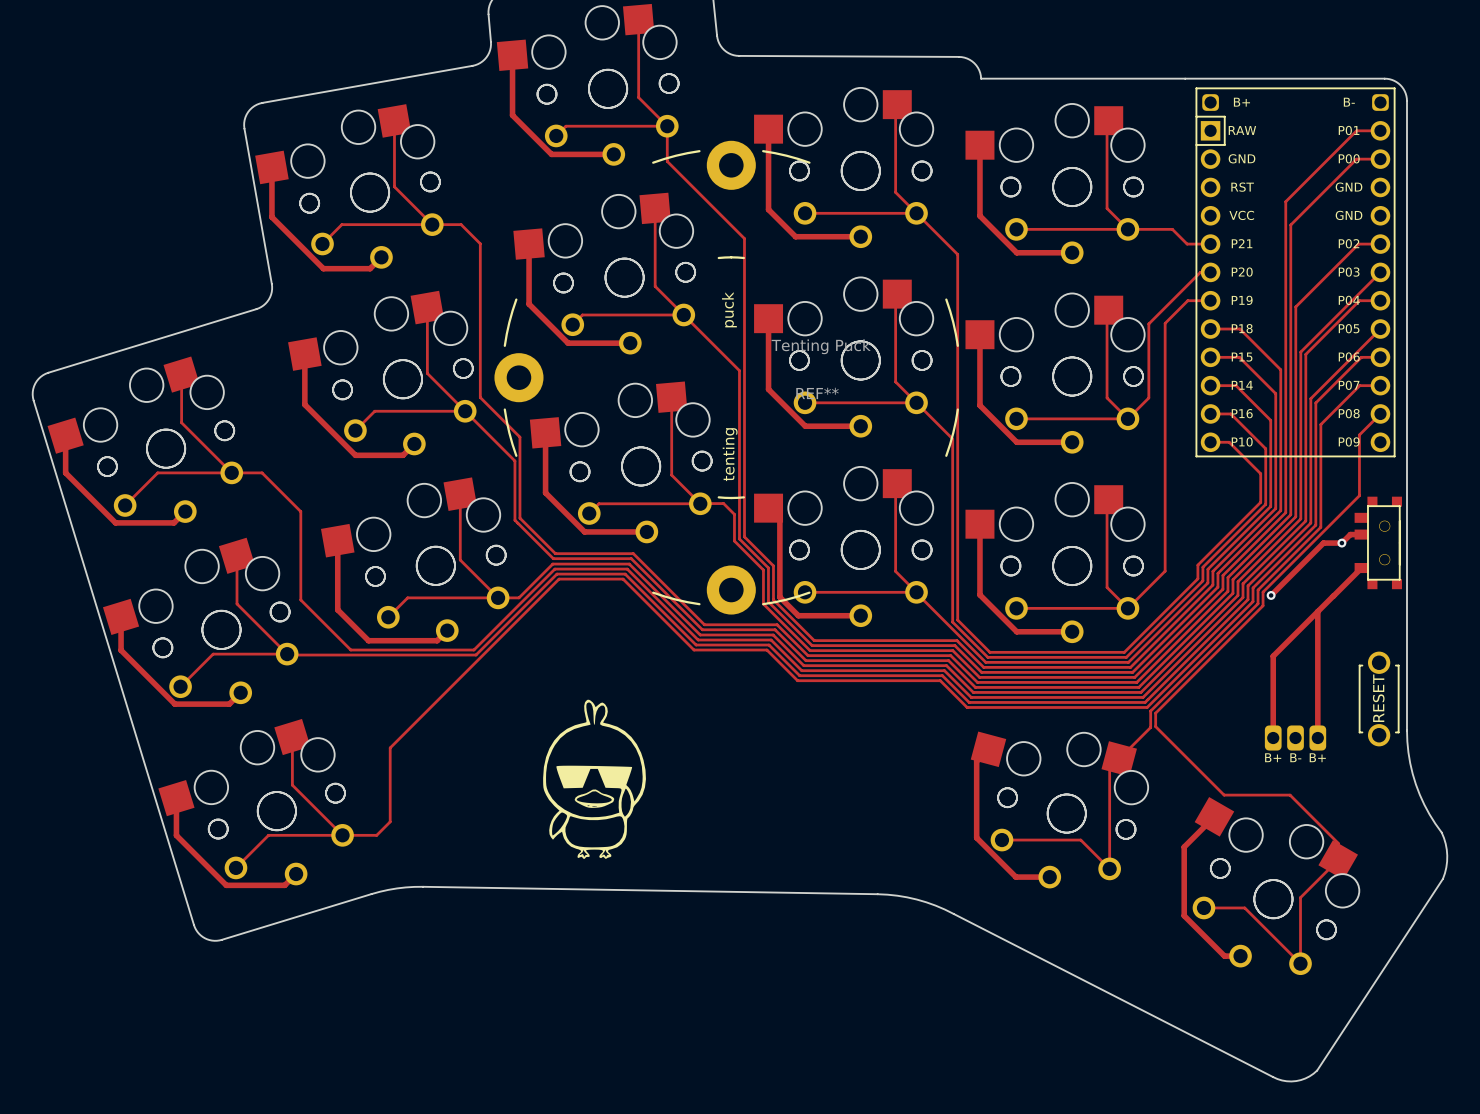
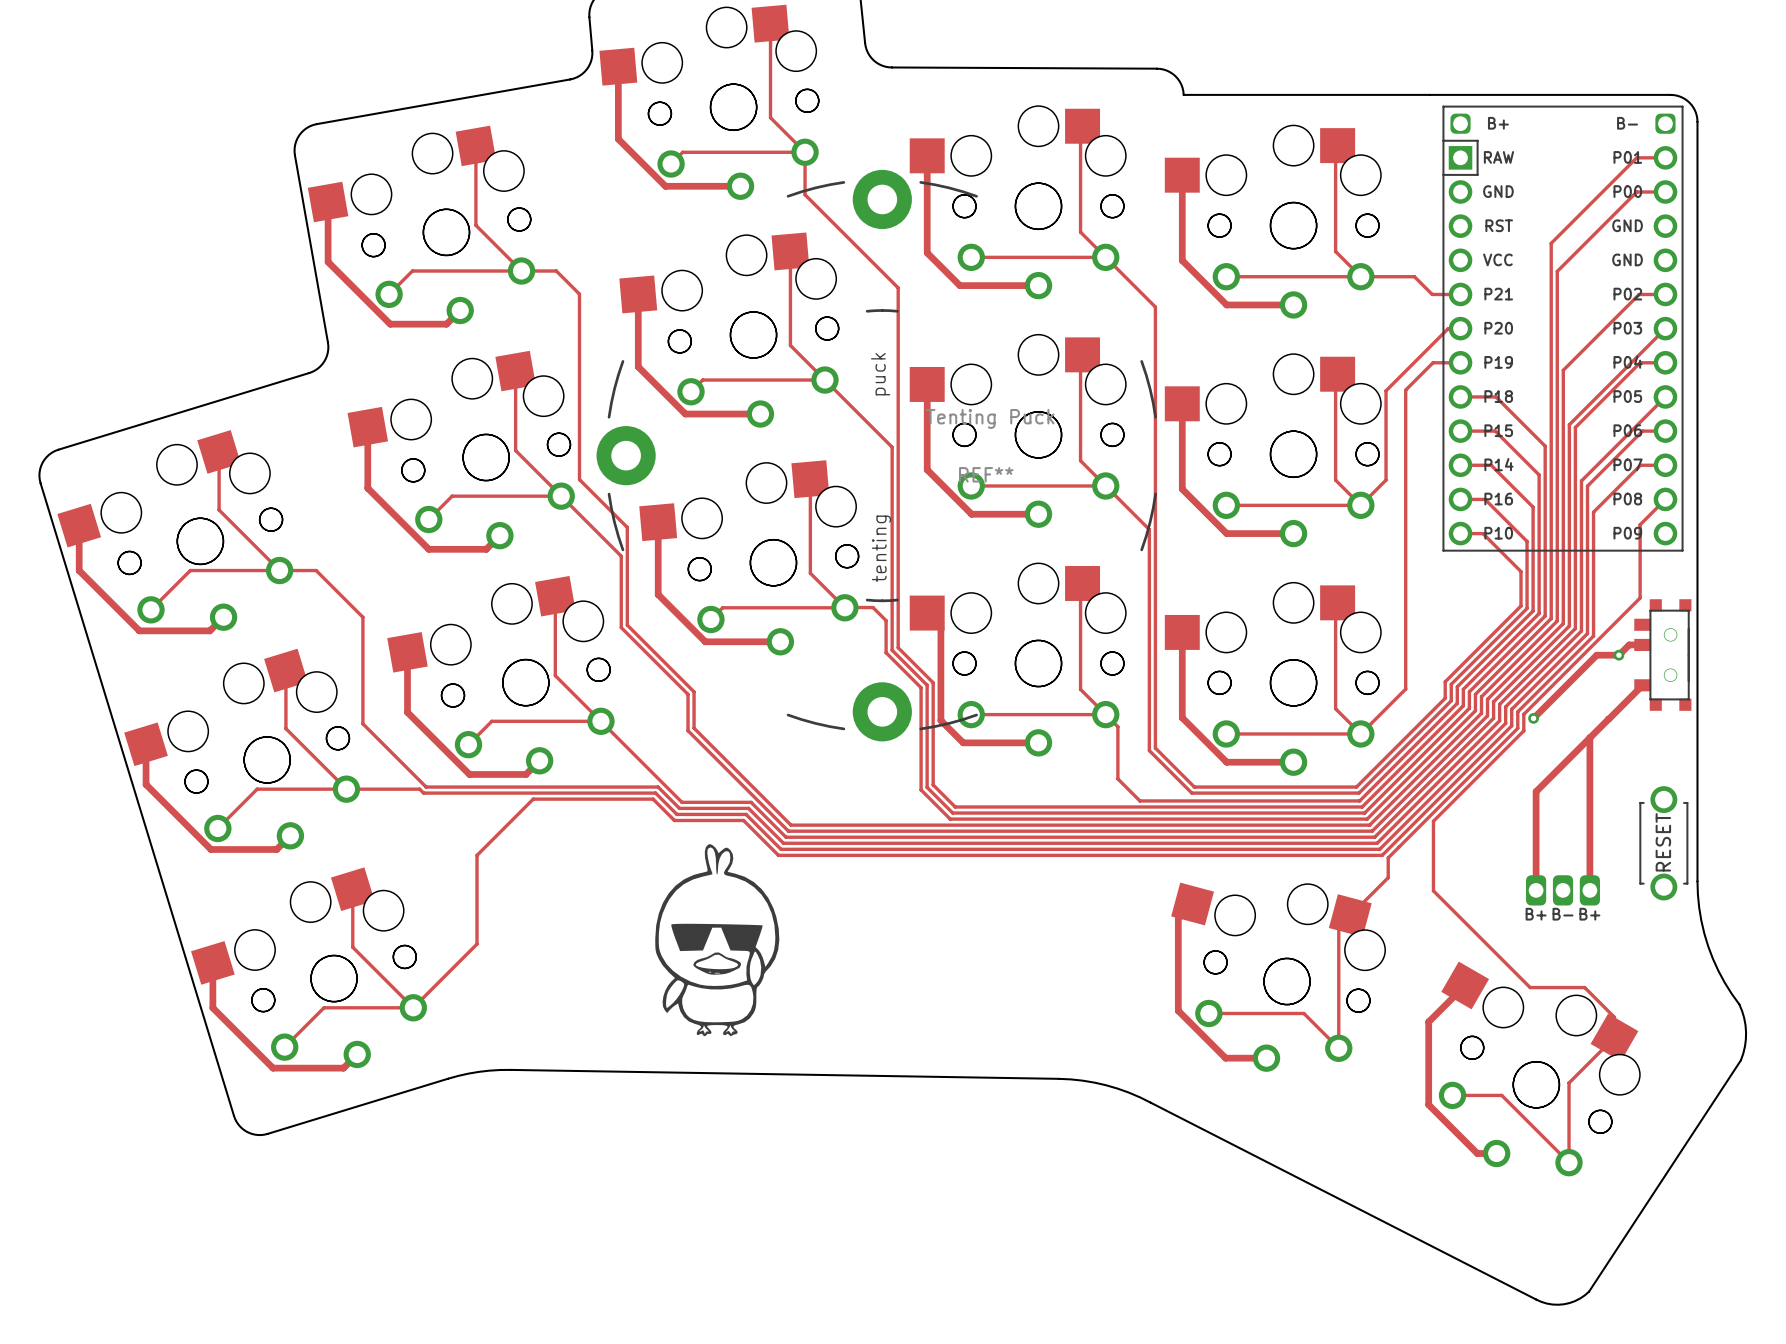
track: (555, 553) (633, 553) (704, 624) (777, 624) (808, 655) (950, 655) (977, 682) (1136, 682) -> (670, 667) (694, 691) (694, 728) (790, 825) (1369, 825) (1371, 823)
track: (553, 558) (631, 558) (702, 629) (775, 629) (805, 660) (948, 660) (975, 687) (1138, 687) -> (667, 674) (688, 694) (688, 730) (788, 831) (1372, 831) (1374, 829)
track: (337, 590) (337, 609) (368, 640) (437, 640) -> (407, 712) (469, 774) (527, 773)
track: (916, 592) (985, 662) (1128, 662) -> (1105, 714) (1117, 726) (1117, 778) (1139, 800) (1359, 800) (1361, 799)
track: (498, 597) (519, 597) (552, 564) (629, 564) (700, 634) (773, 634) (803, 665) (946, 665) (973, 692) (1140, 692) -> (600, 721) (681, 802) (751, 802) (785, 837) (1374, 837) (1376, 835)
track: (773, 599) (814, 640) (956, 640) (983, 667) (1130, 667) -> (933, 723) (933, 784) (955, 807) (1362, 807) (1364, 805)
track: (768, 601) (812, 645) (954, 645) (981, 672) (1132, 672) -> (927, 726) (927, 787) (952, 813) (1364, 813) (1366, 811)
track: (763, 604) (810, 650) (952, 650) (979, 677) (1134, 677) -> (921, 728) (921, 789) (950, 819) (1367, 819) (1369, 817)
track: (350, 650) (473, 650) (554, 569) (627, 569) (698, 640) (771, 640) (801, 670) (944, 670) (971, 697) (1143, 697) -> (423, 784) (426, 787) (658, 787) (679, 808) (748, 808) (783, 843) (1377, 843) (1379, 841)
track: (287, 654) (476, 655) (556, 574) (625, 574) (696, 645) (769, 645) (799, 675) (942, 675) (969, 702) (1145, 702) -> (346, 789) (419, 789) (423, 793) (655, 793) (676, 814) (746, 814) (780, 849) (1379, 849) (1381, 847)
track: (1188, 680) (1155, 713) (1155, 726) (1224, 795) (1290, 795) (1313, 818) -> (1433, 821) (1433, 890) (1530, 987) (1584, 987)
track: (1147, 707) (967, 707) (940, 680) (797, 680) (766, 650) (694, 650) (623, 579) (559, 579) (390, 747) (390, 821) (376, 835) (342, 835) -> (1384, 853) (1382, 855) (778, 855) (743, 820) (674, 820) (653, 799) (533, 799) (477, 855) (477, 944) (413, 1007)

